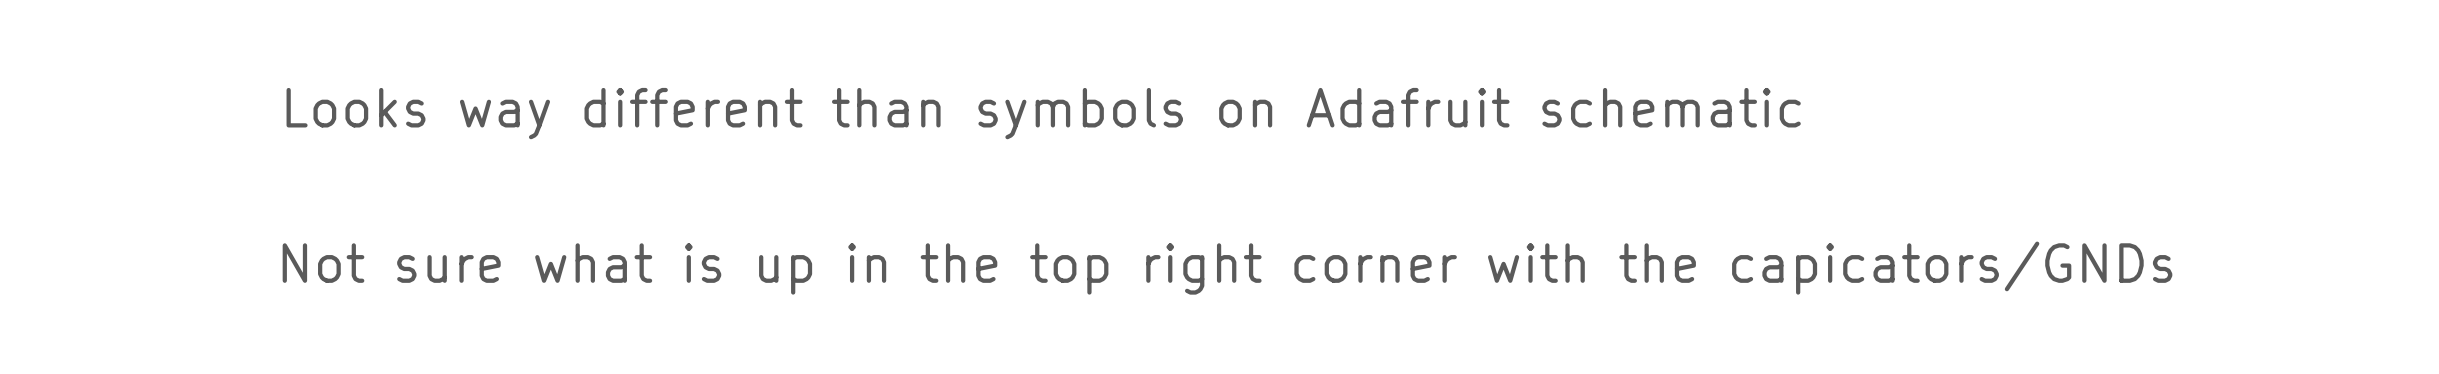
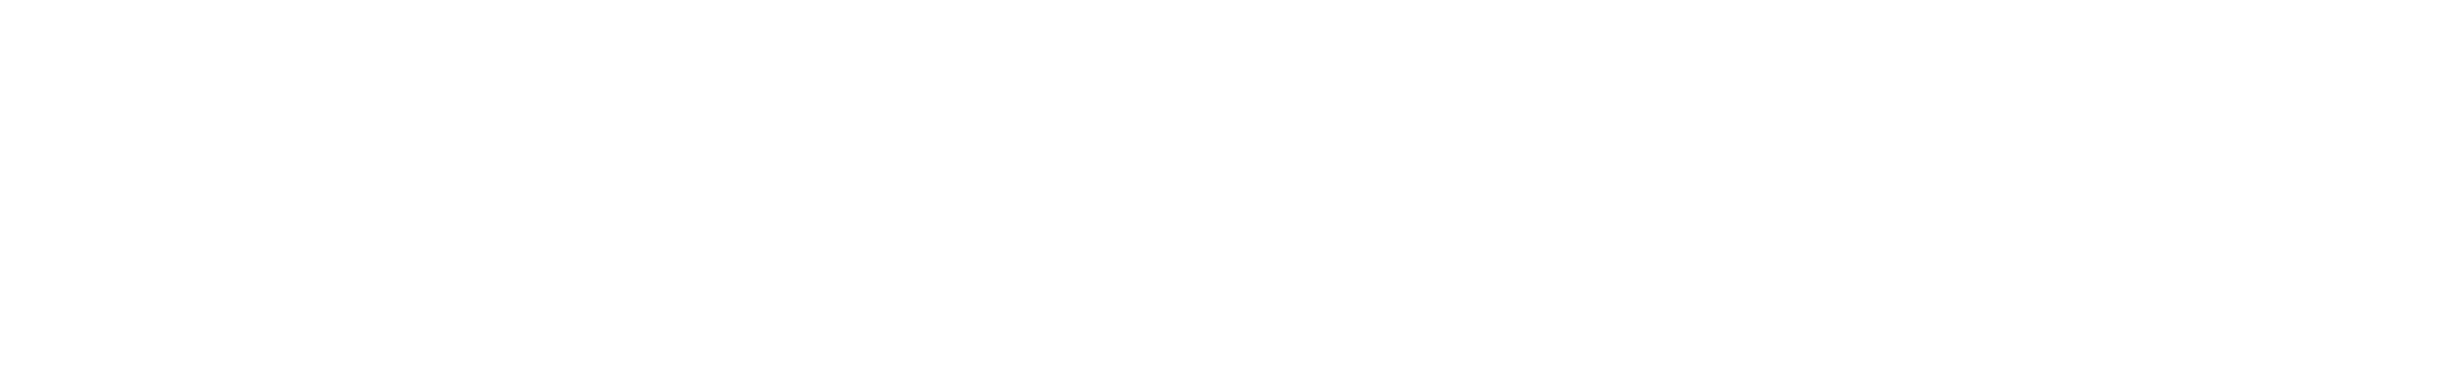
text: Looks way different than symbols on Adafruit schematic (1043, 113) -> none
text: Not sure what is up in the top right corner with the capicators/GNDs (1227, 268) -> none

